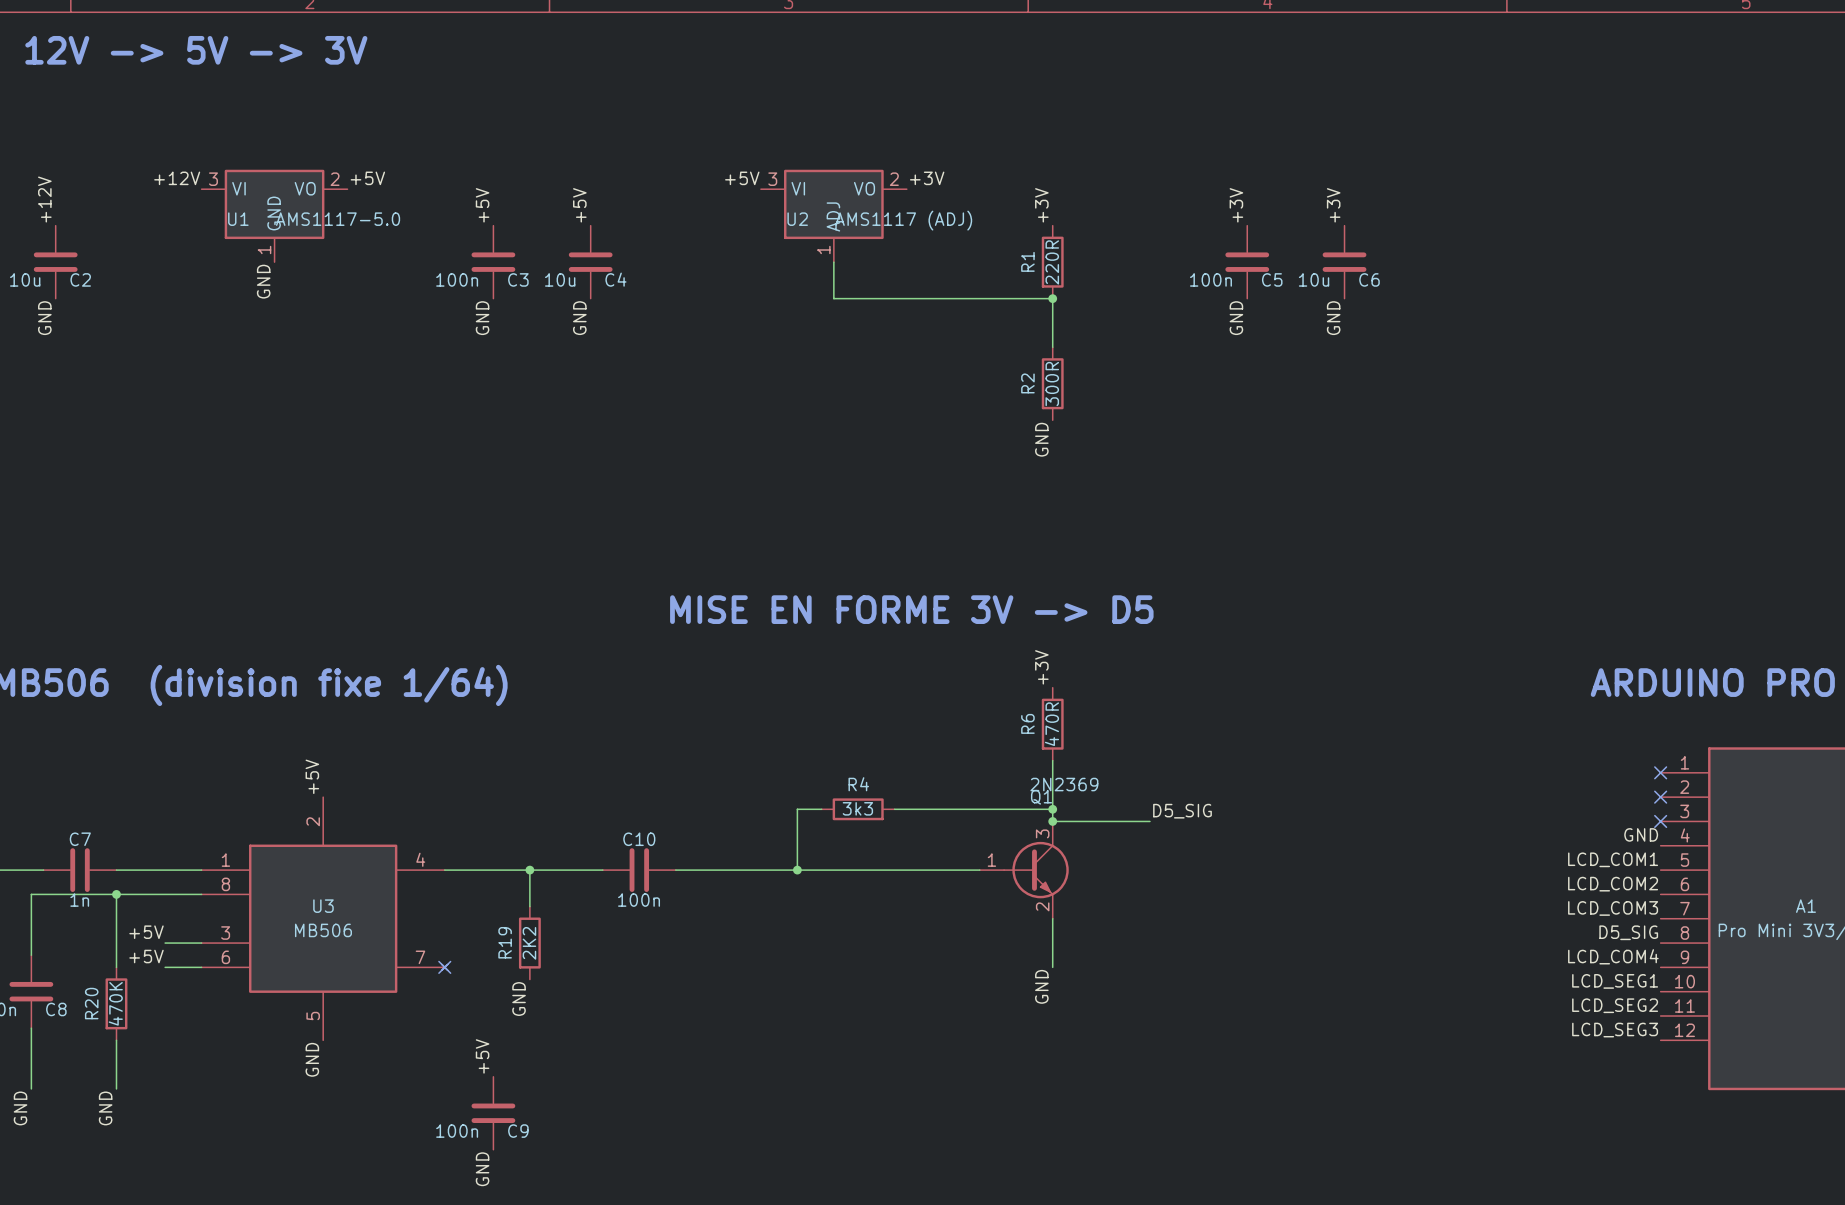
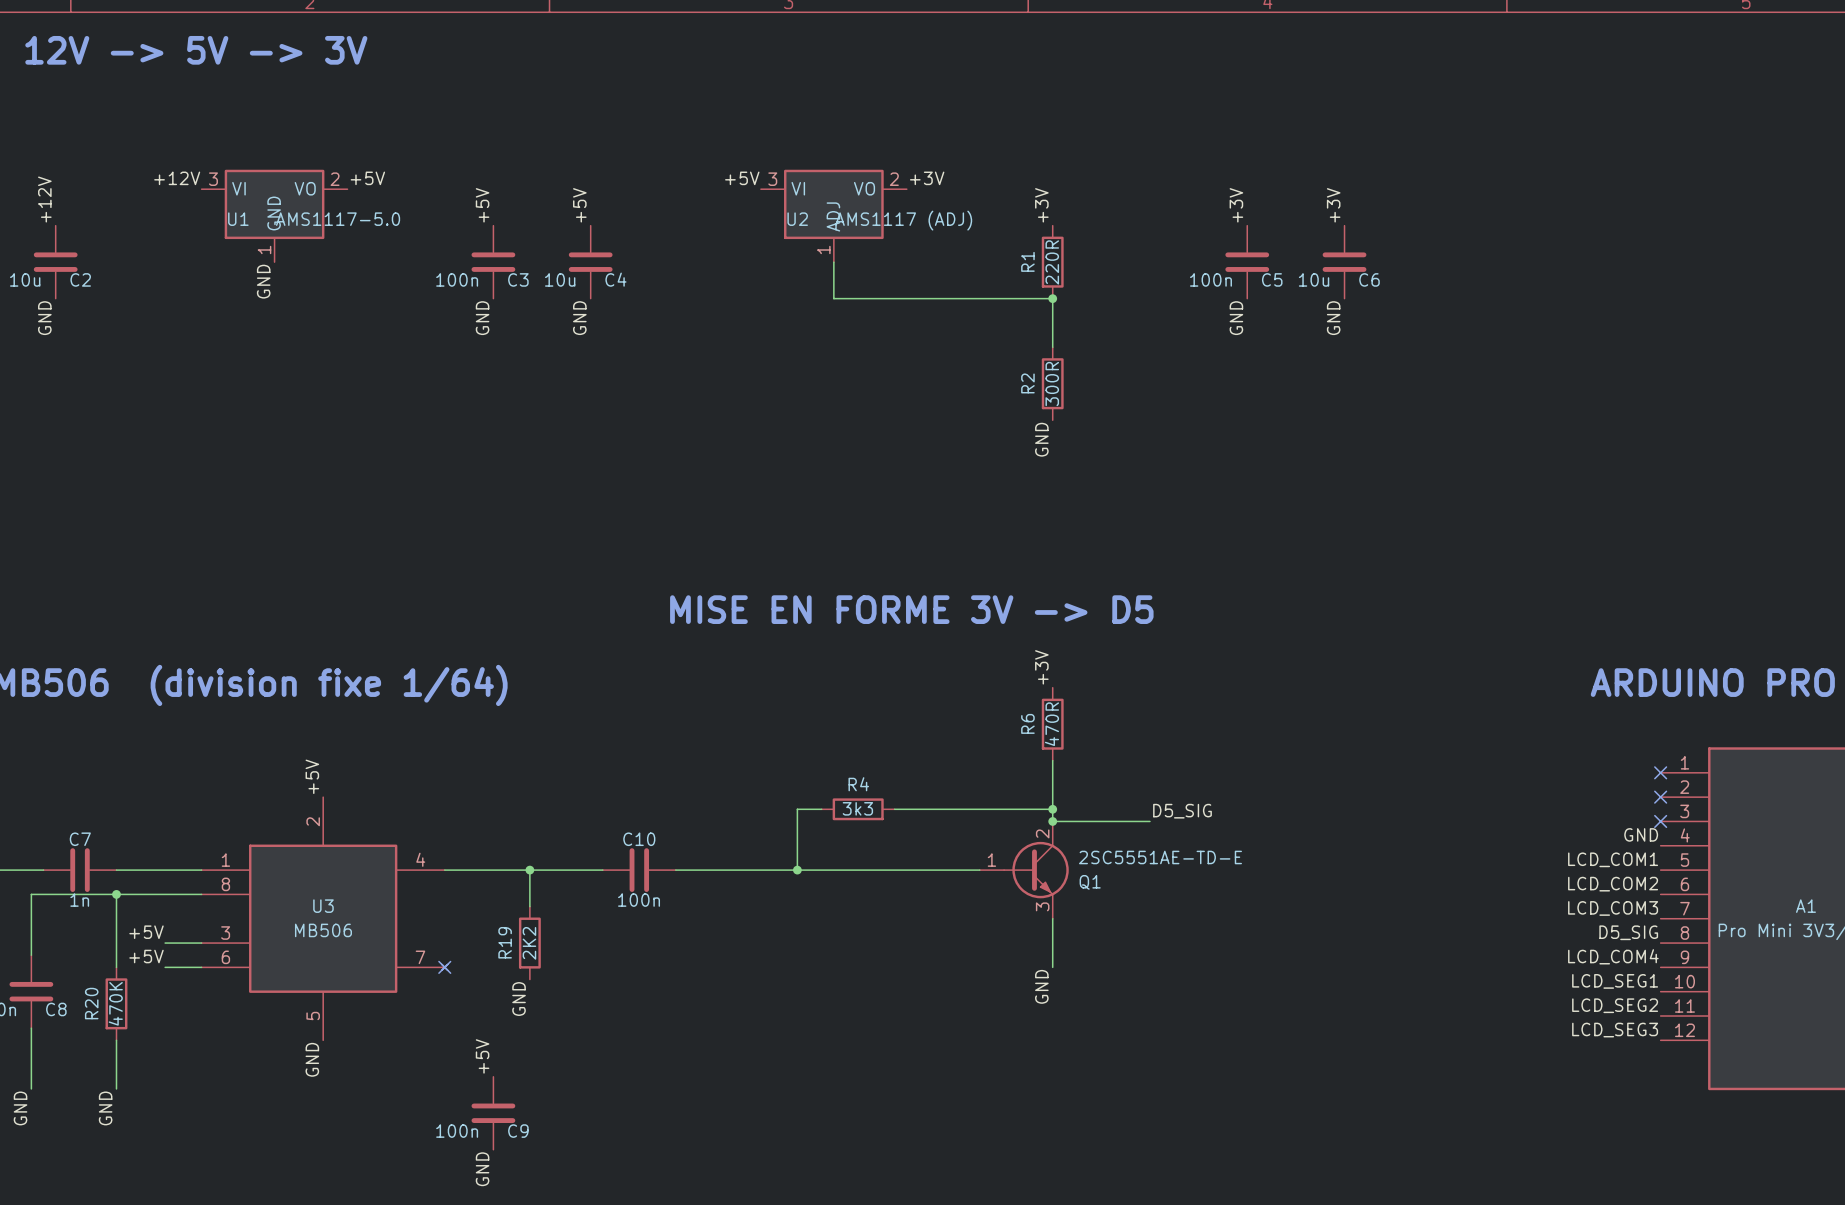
Q1 value: 2N2369 (1064, 784) -> 2SC5551AE-TD-E (1160, 857)
Q1 name position: Q1 (1041, 797) -> Q1 (1090, 882)
Q1 pin number: 3 (1042, 833) -> 2 (1042, 833)
Q1 pin number: 2 (1042, 906) -> 3 (1042, 906)

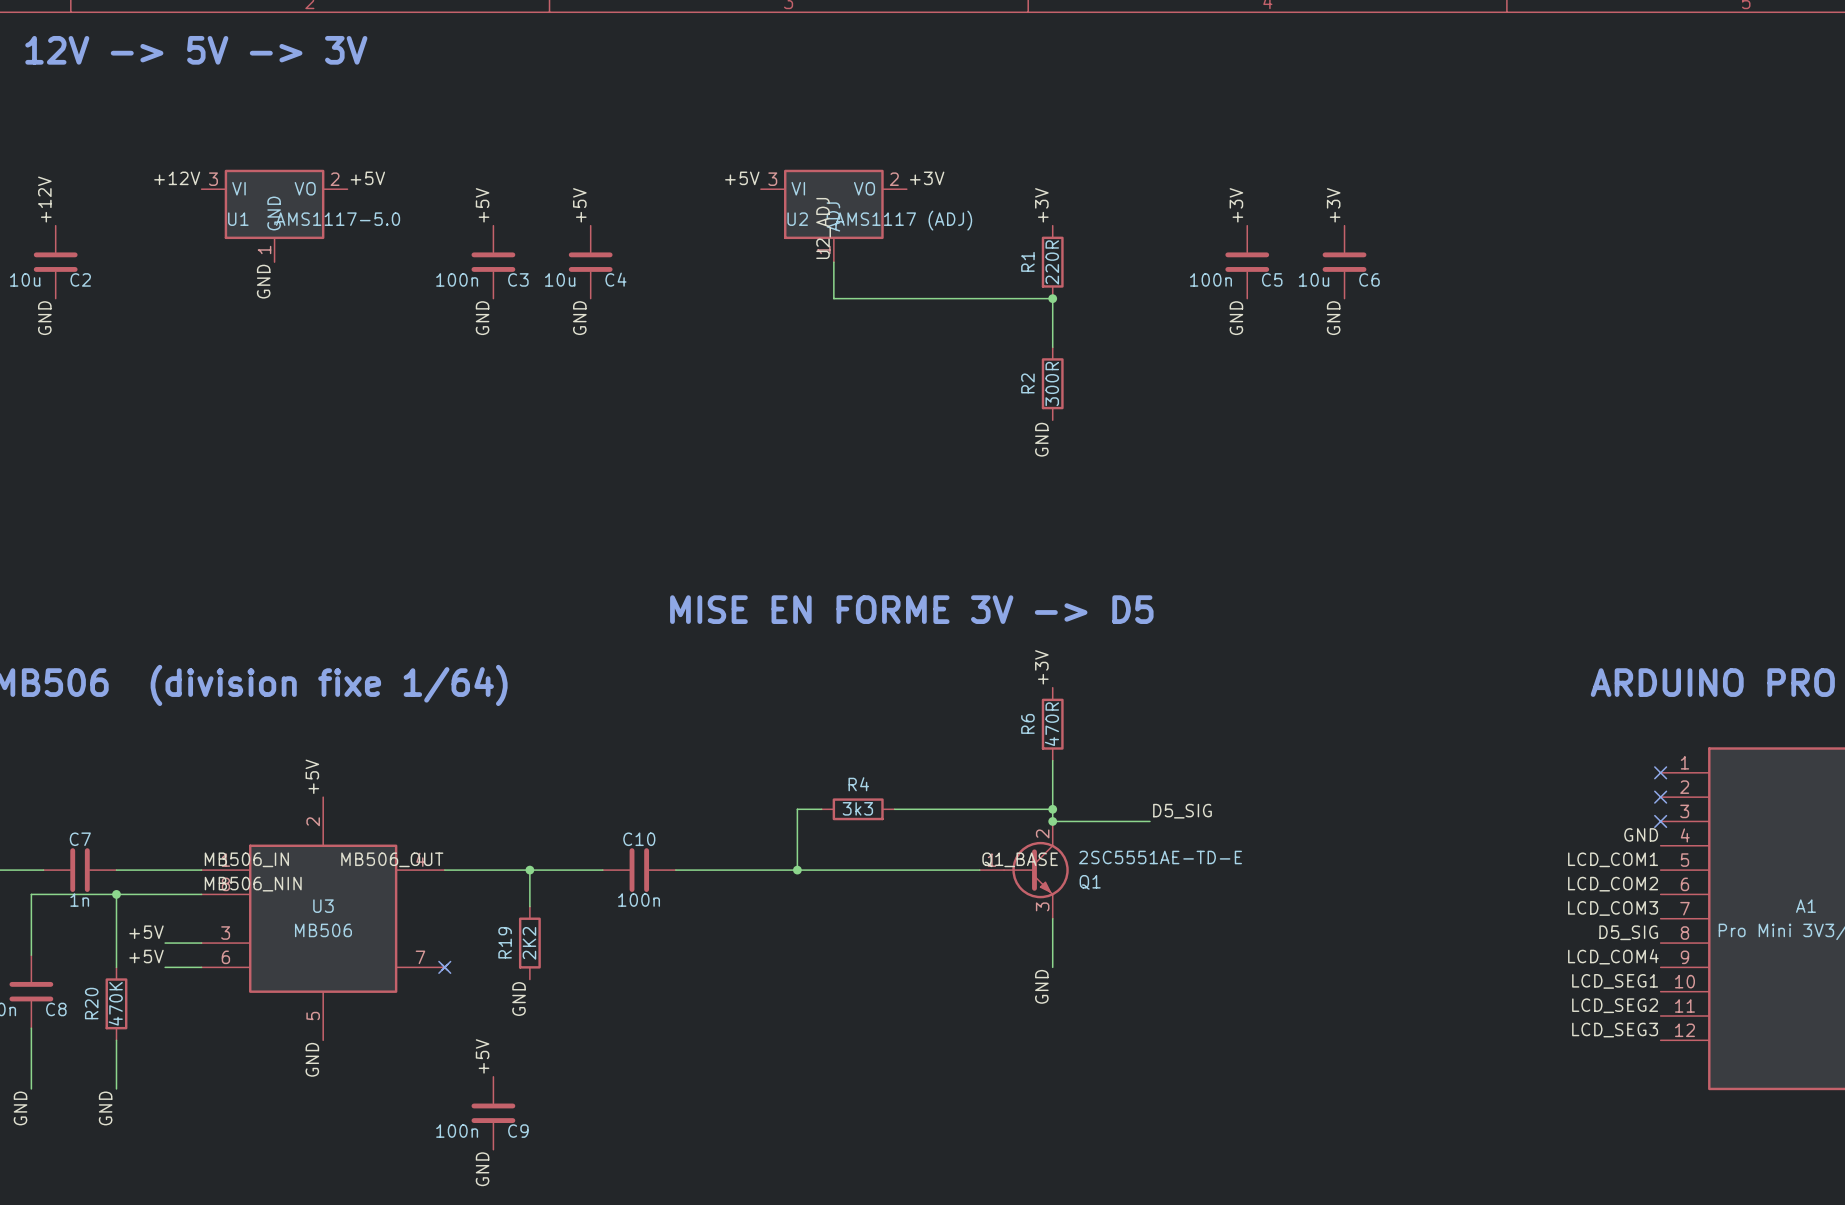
label: none -> U2_ADJ (823, 228)
label: none -> MB506_IN (246, 859)
label: none -> MB506_OUT (392, 859)
label: none -> Q1_BASE (1020, 859)
label: none -> MB506_NIN (253, 884)

